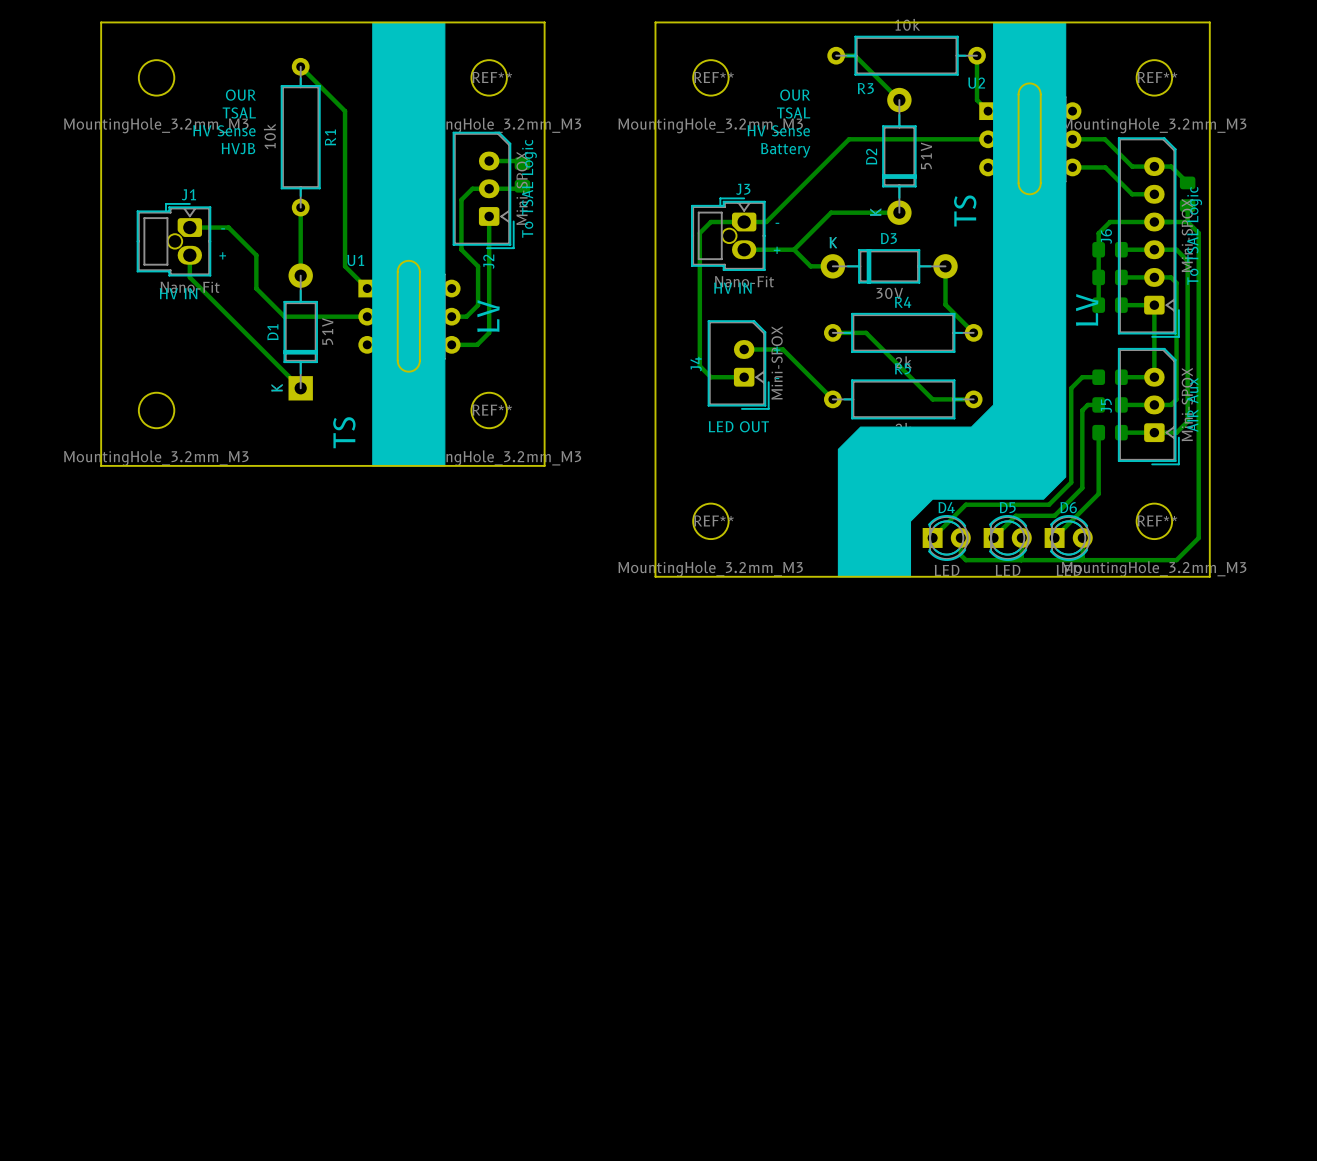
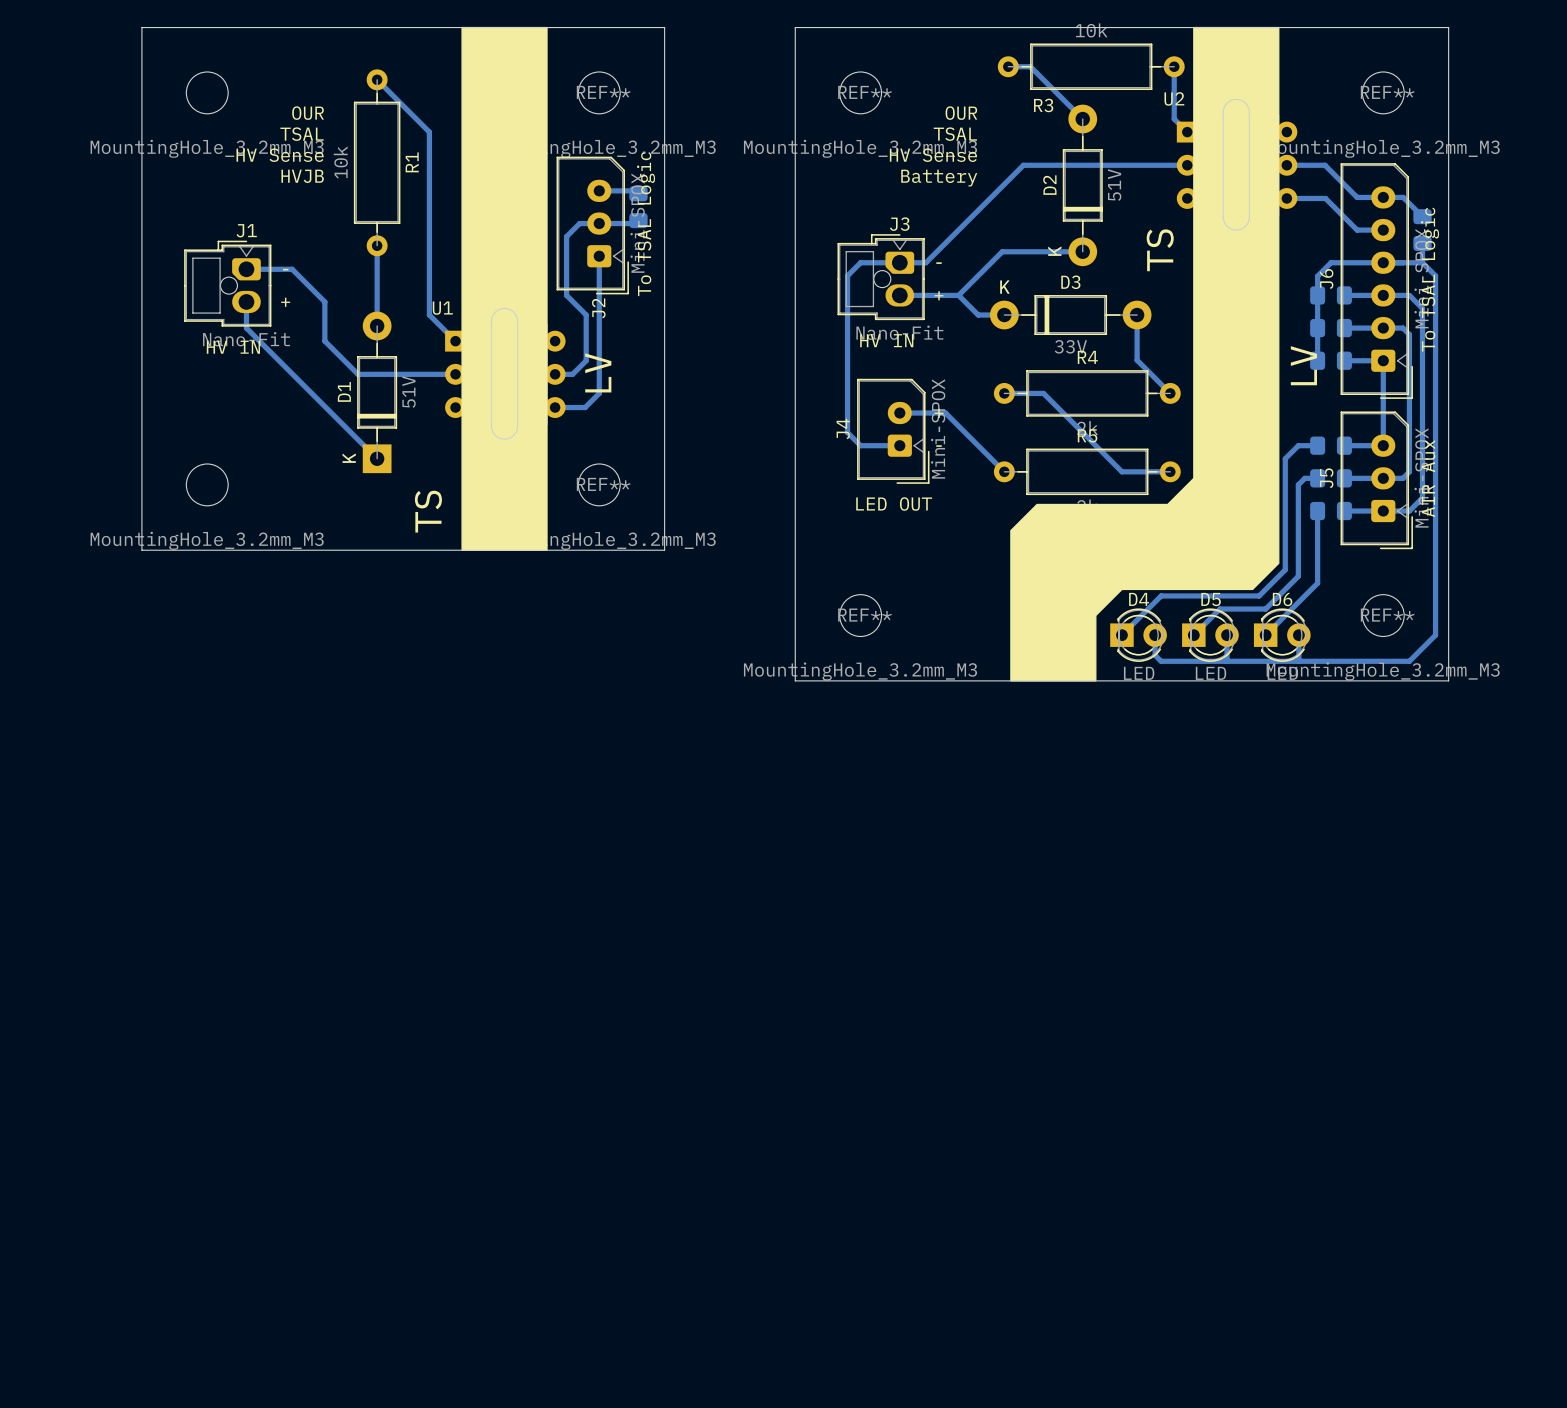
D3 value: 30V (889, 293) -> 33V (1070, 346)

